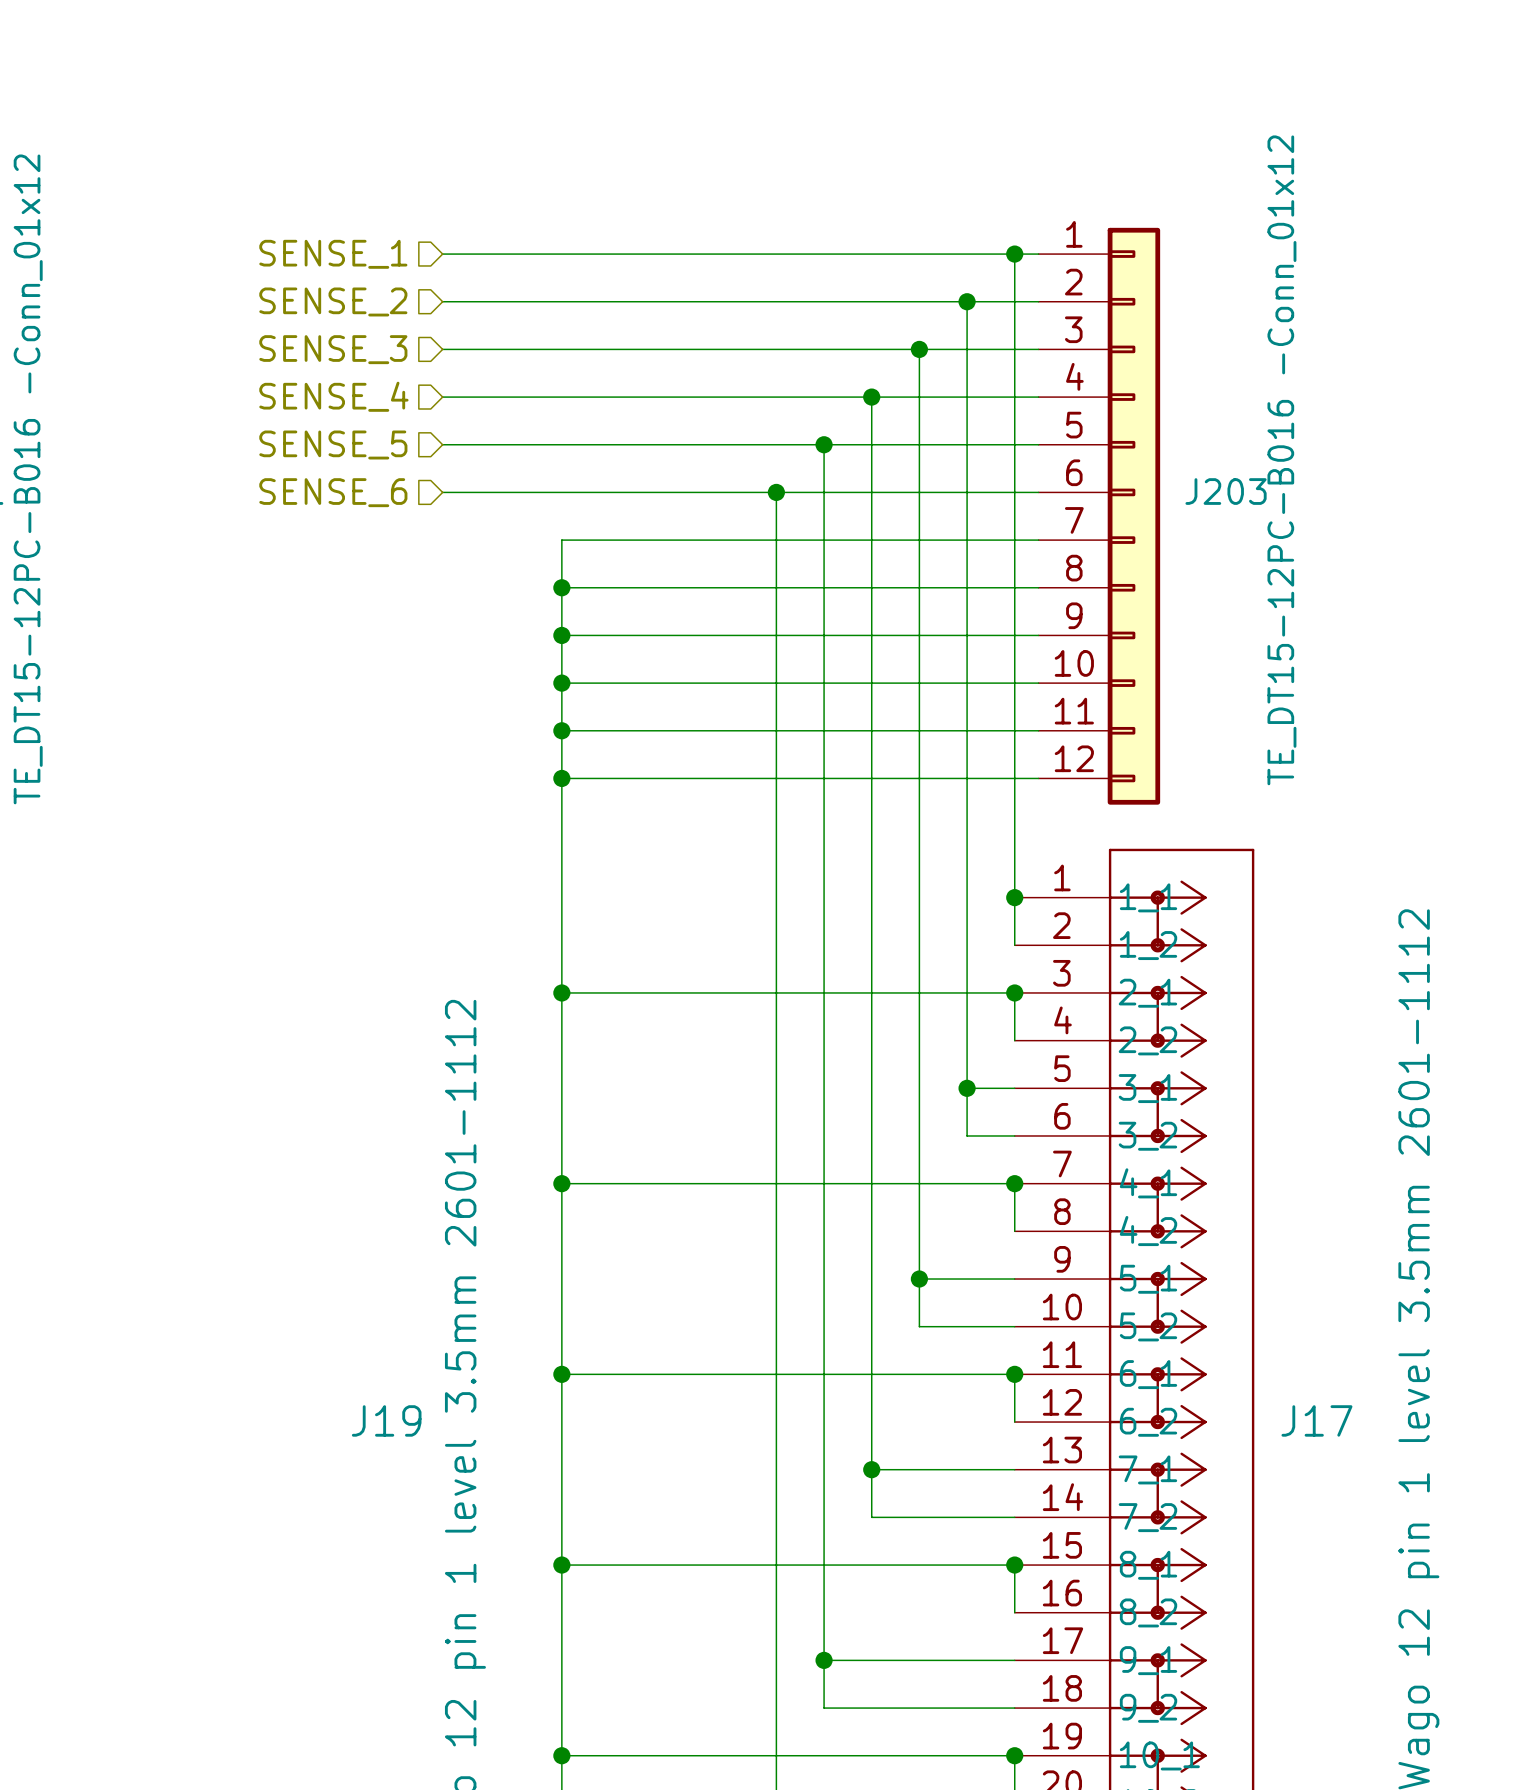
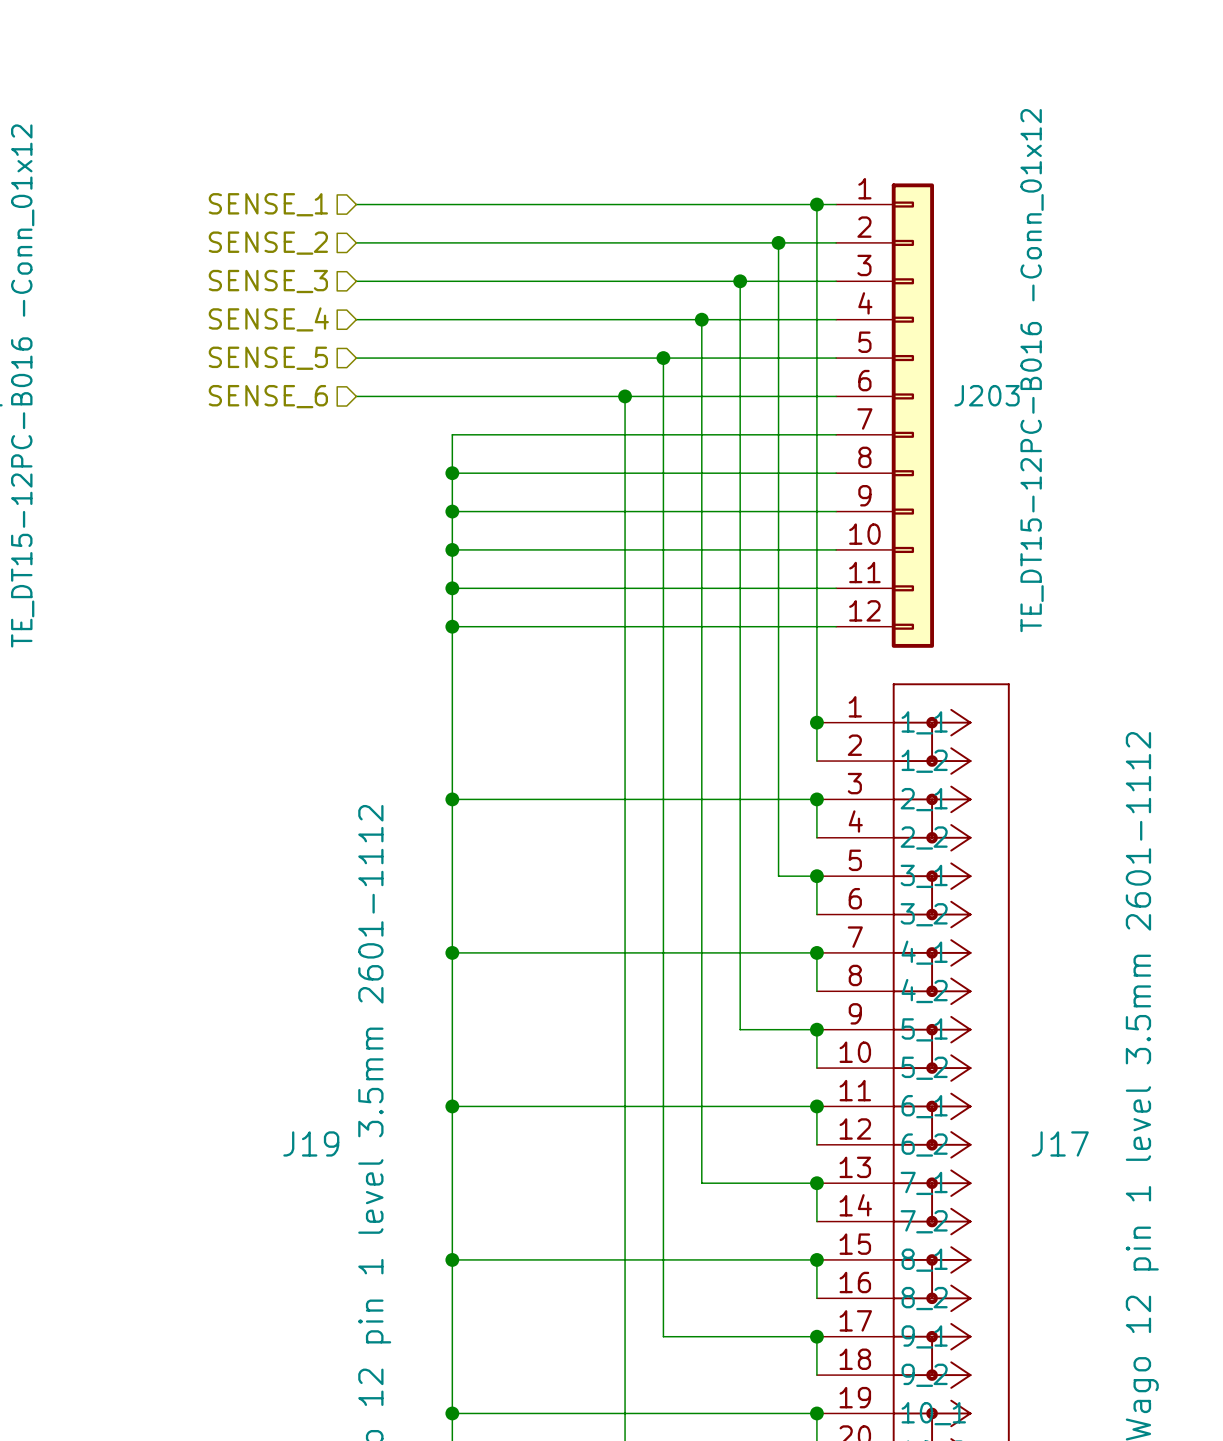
wire: (967, 1088) (967, 1135) (1014, 1135) -> (816, 876) (816, 914)
junction position: (967, 1088) -> (816, 876)
wire: (919, 1279) (919, 1326) (1014, 1326) -> (816, 1029) (816, 1068)
junction position: (919, 1279) -> (816, 1029)
wire: (871, 1469) (871, 1517) (1014, 1517) -> (816, 1183) (816, 1221)
junction: (871, 1469) -> none
junction: none -> (816, 1183)
wire: (824, 1660) (824, 1708) (1014, 1708) -> (816, 1336) (816, 1375)
junction: (824, 1660) -> none
junction: none -> (816, 1336)

